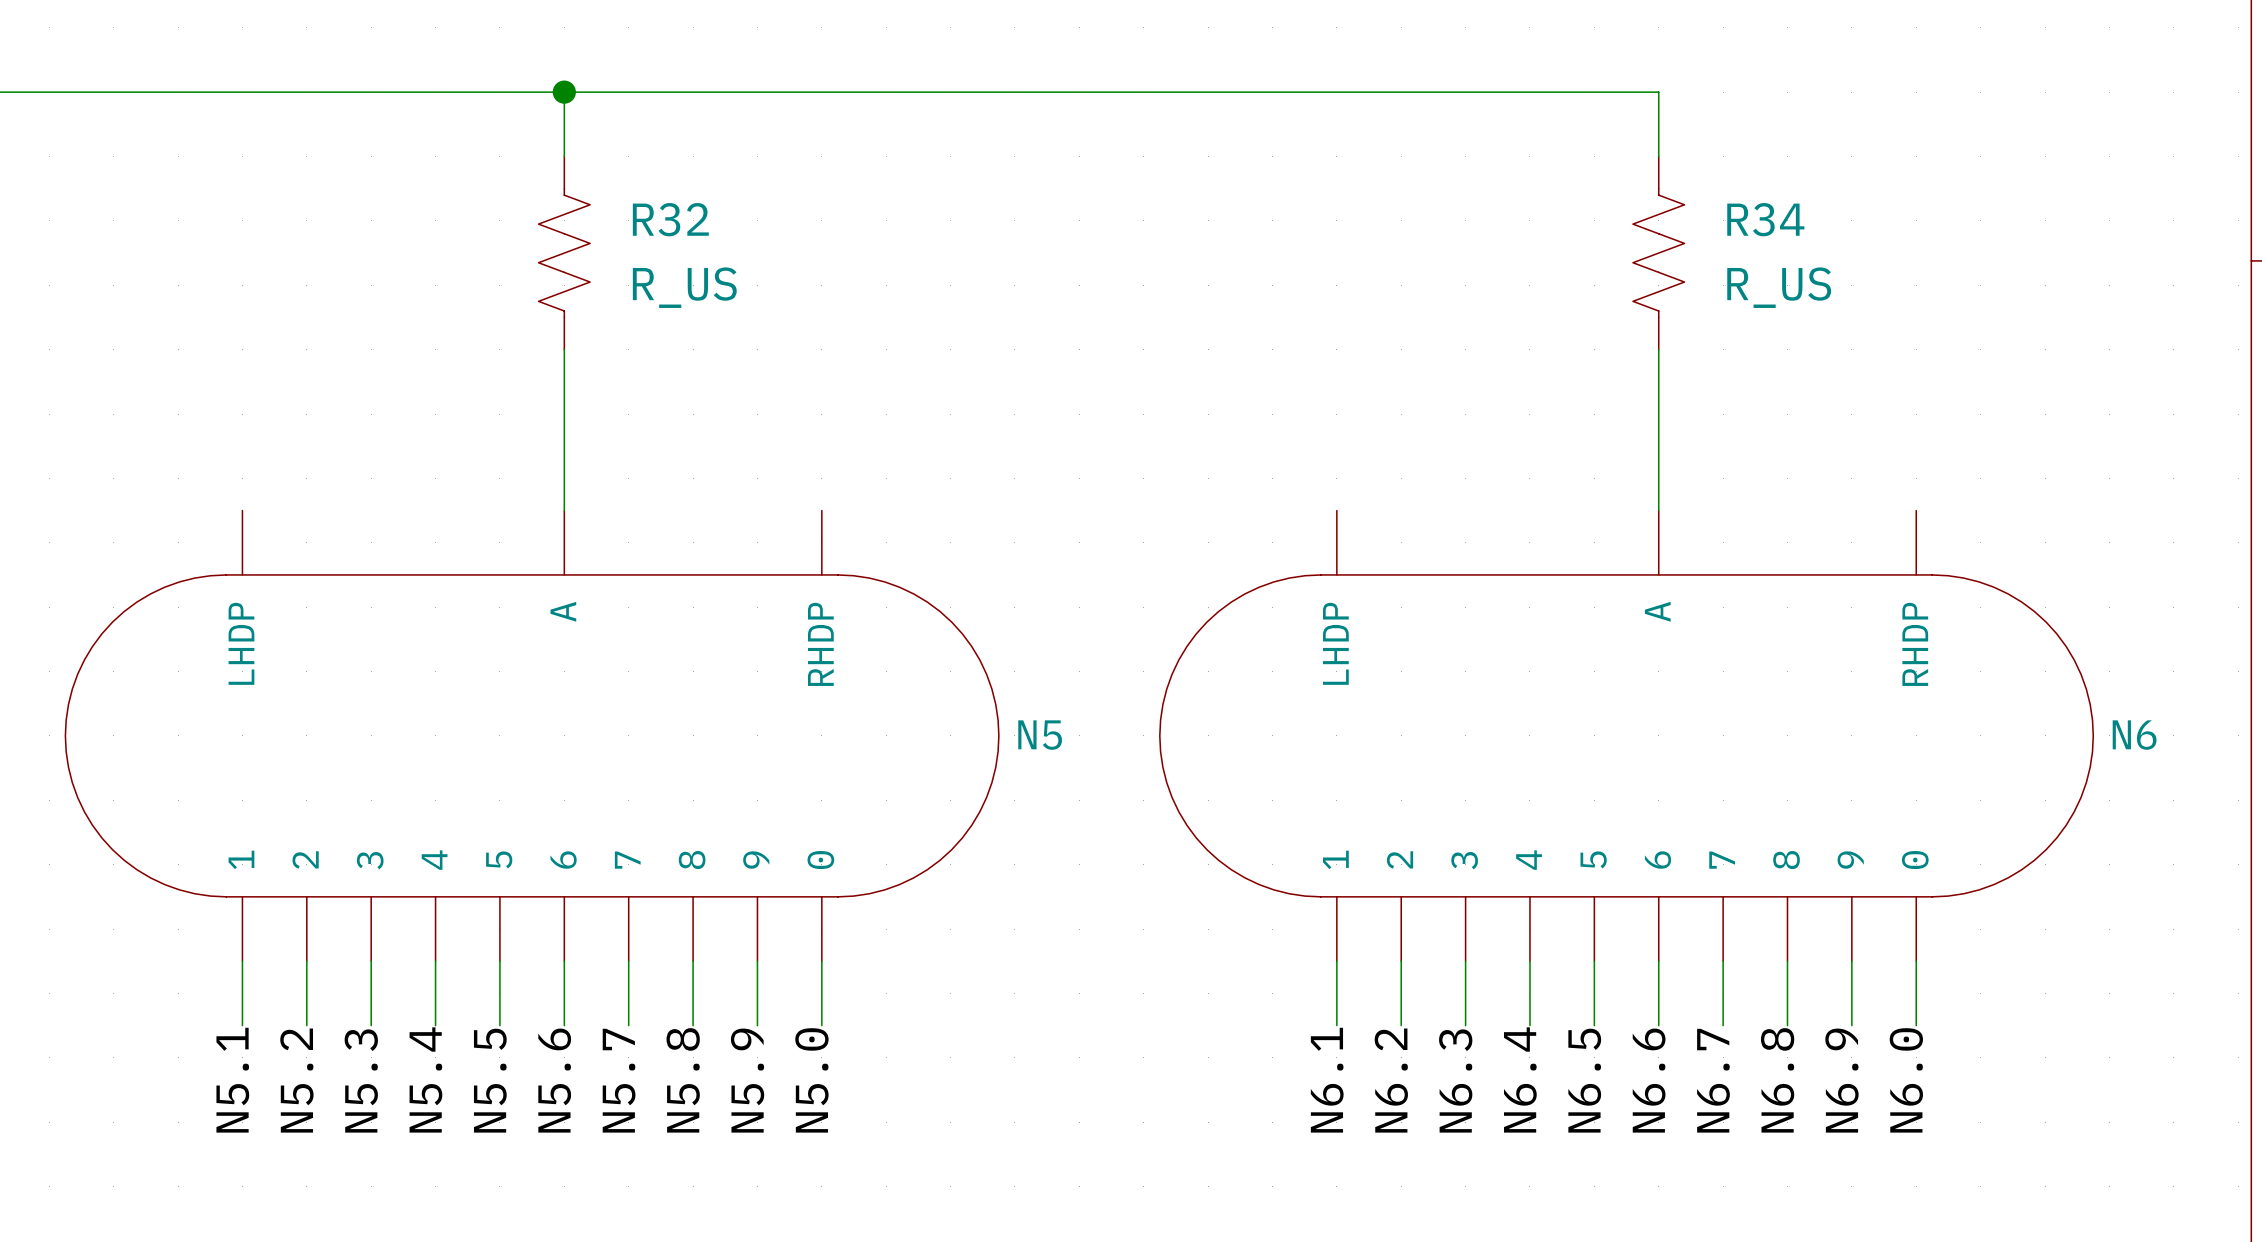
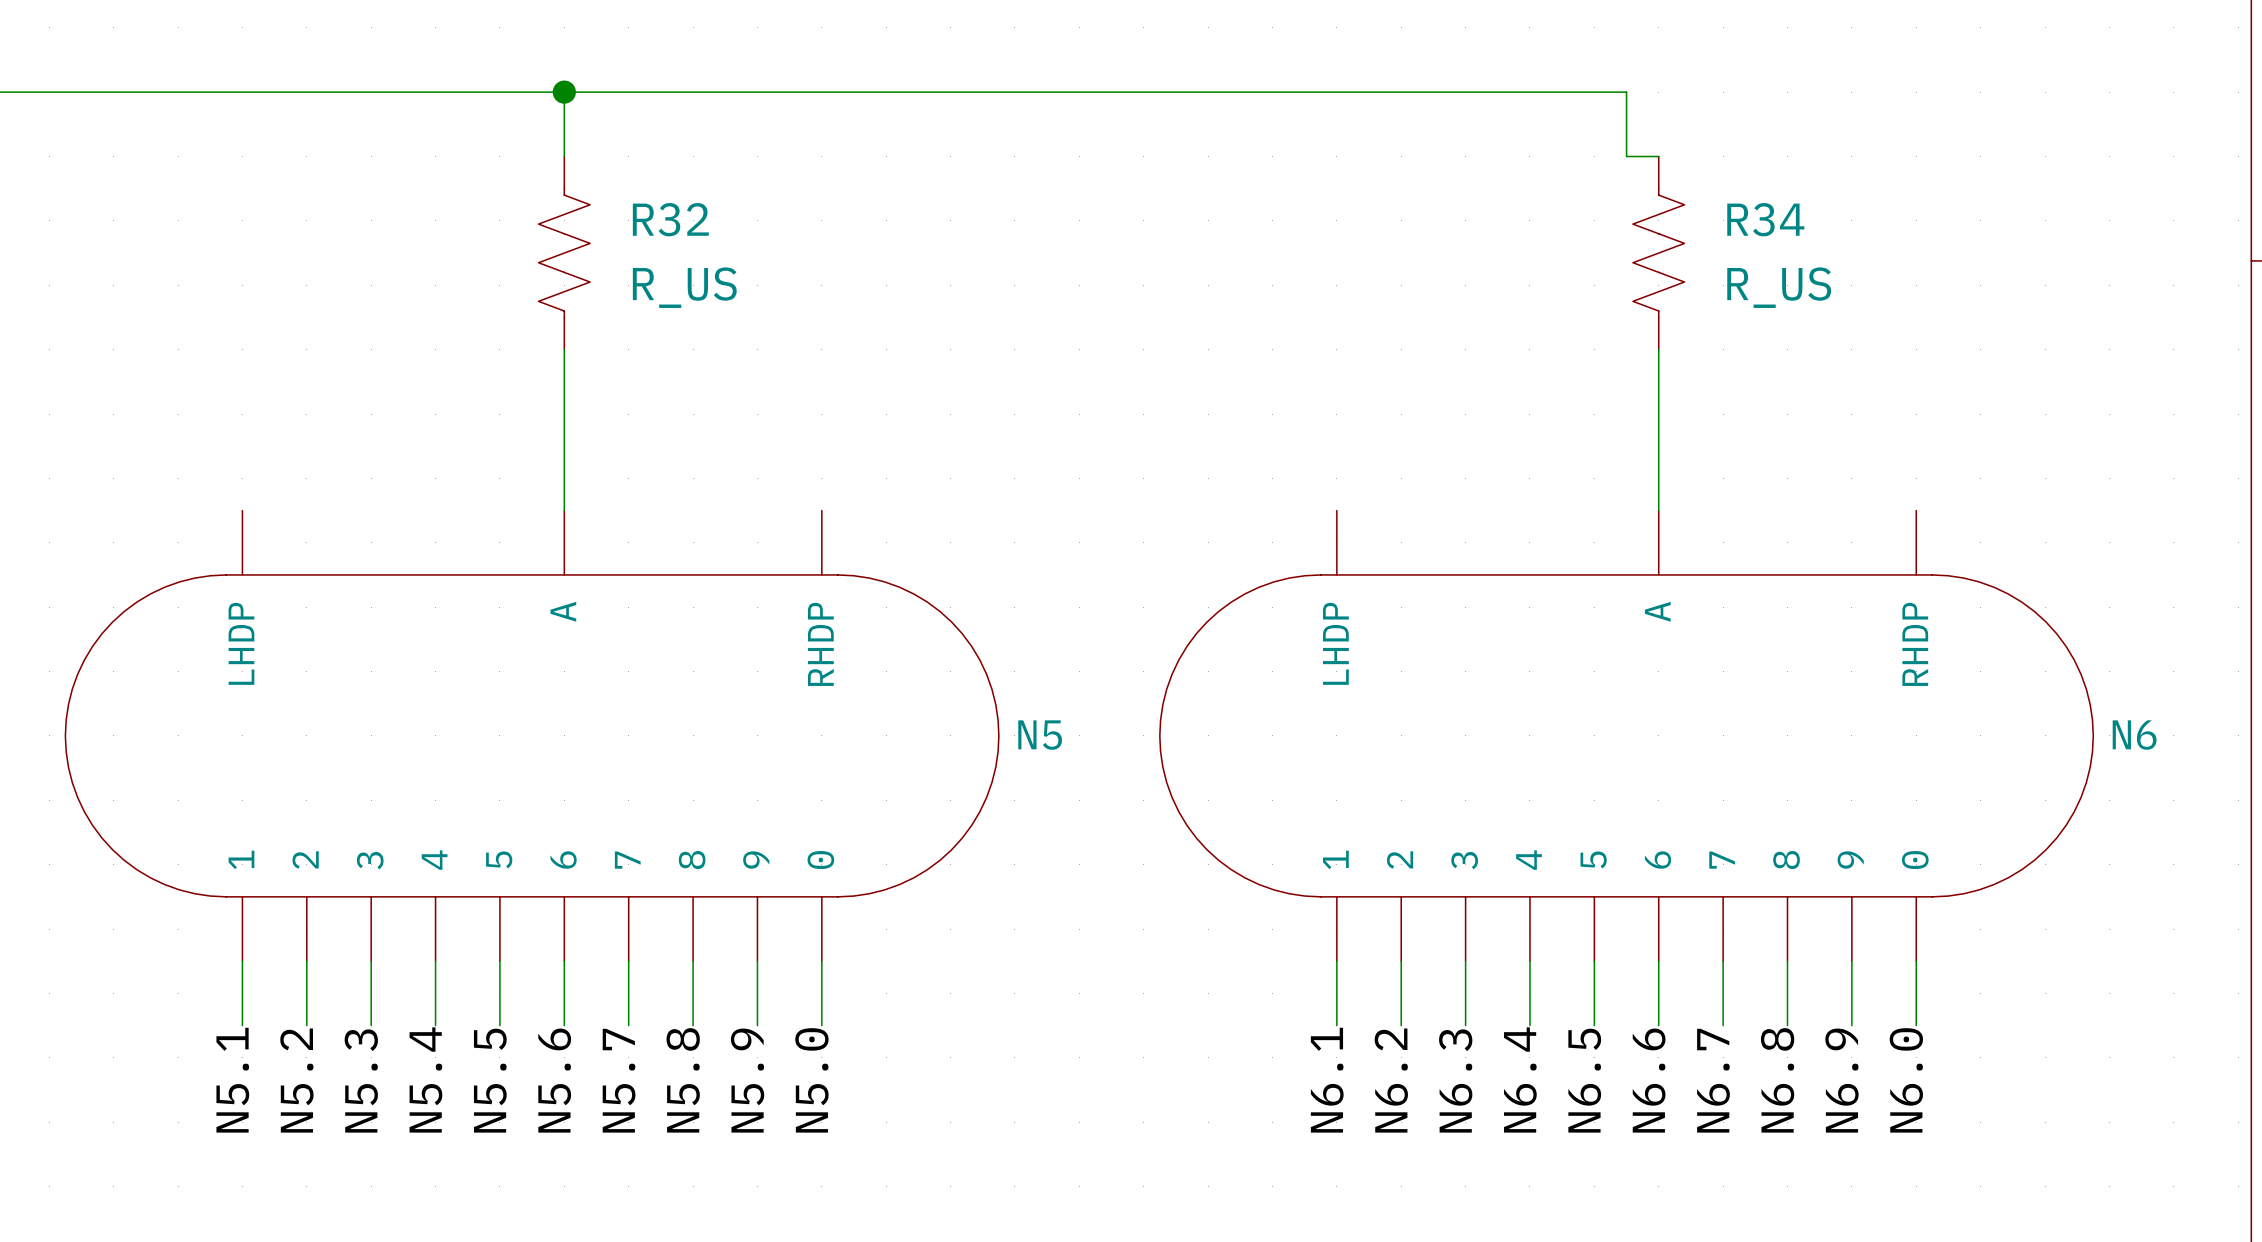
wire: (1626, 92) (1658, 92) (1658, 156) -> (1626, 92) (1626, 156) (1658, 156)

